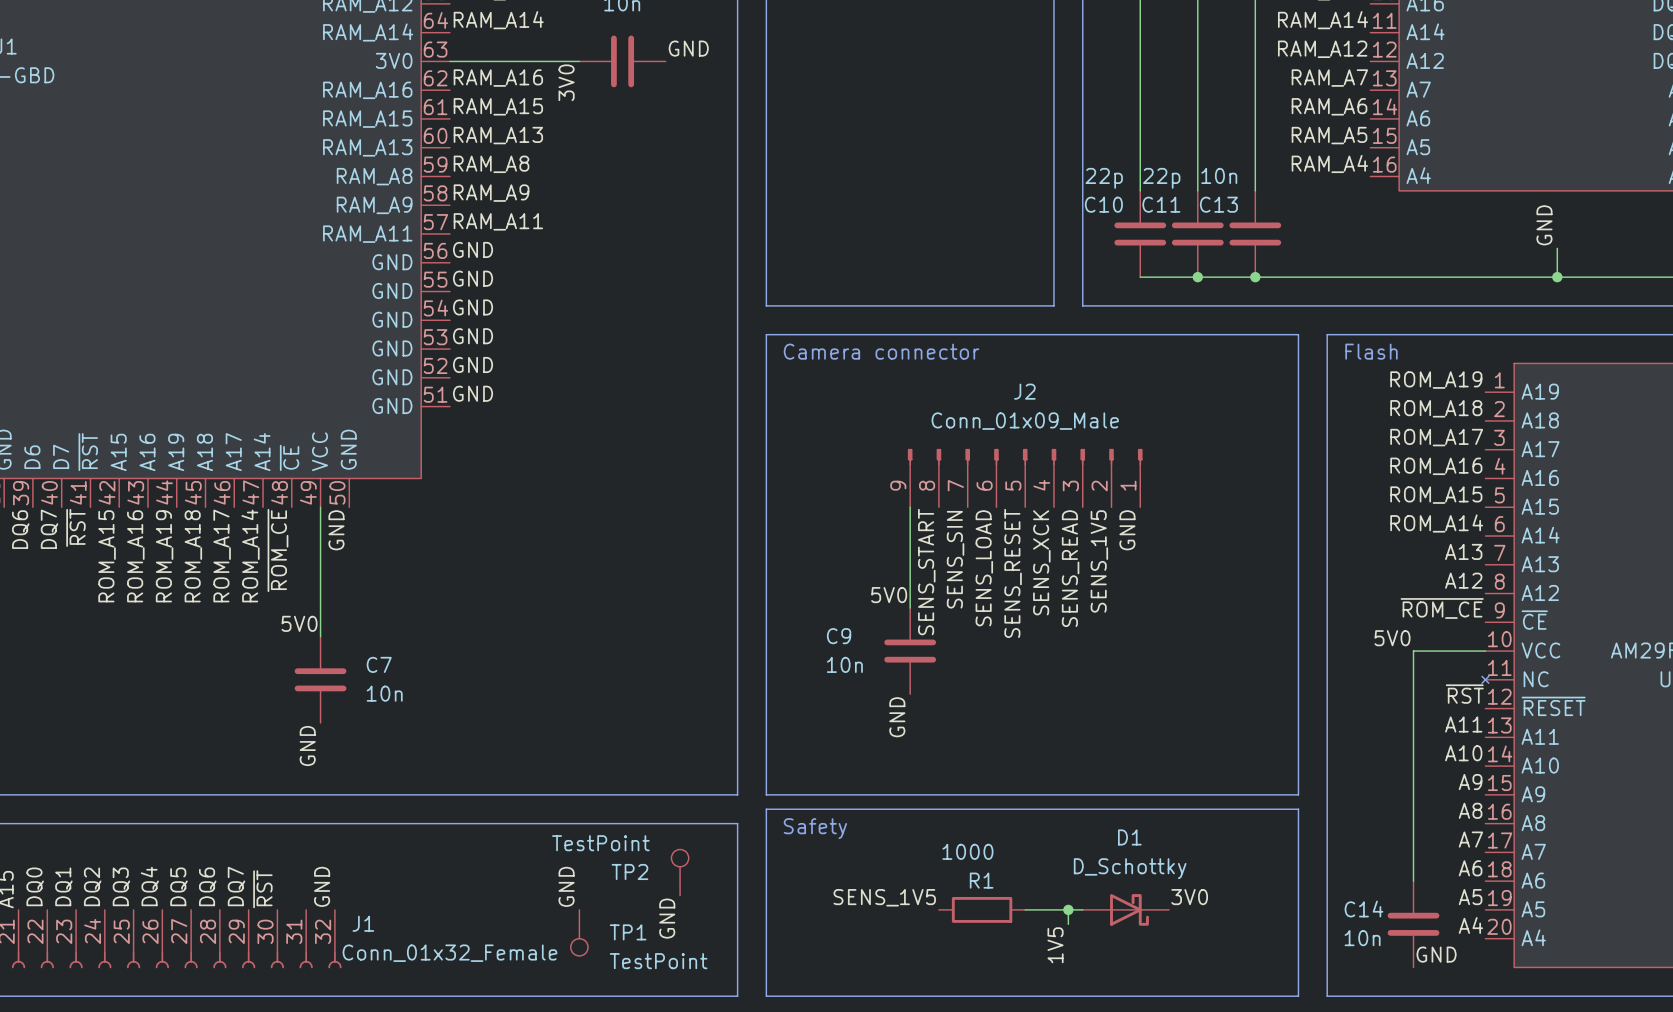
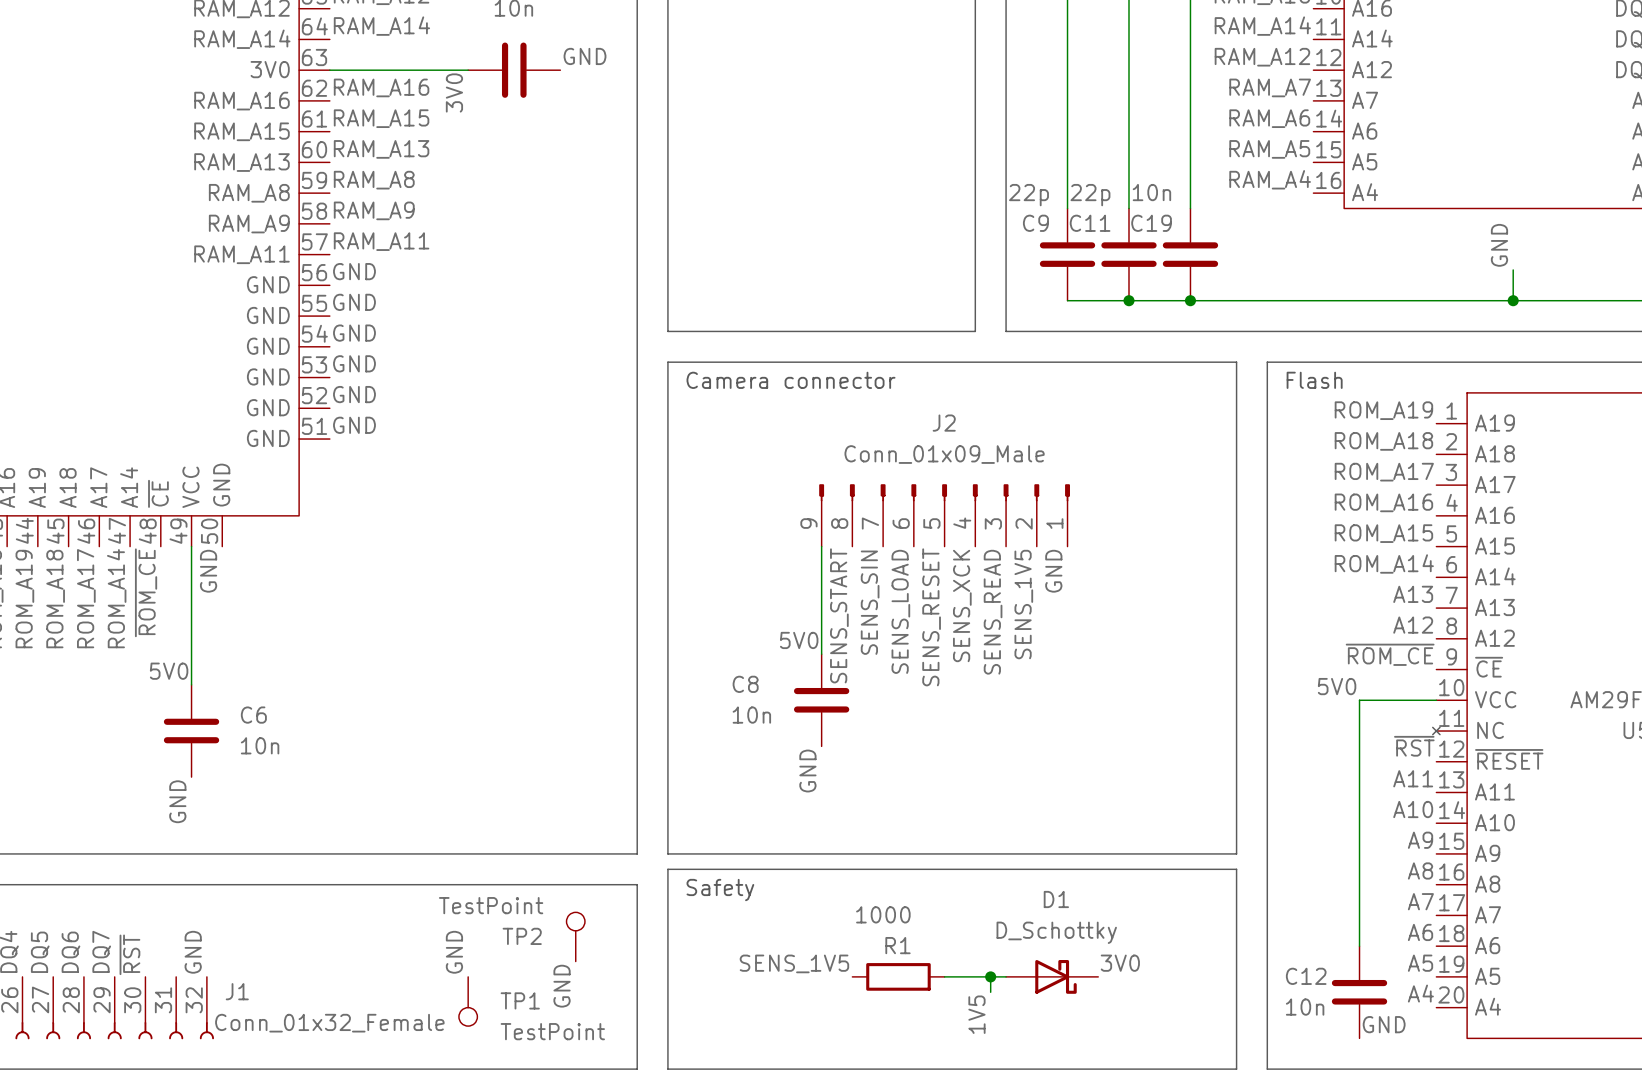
C10 name: C10 (1103, 204) -> C9 (1035, 223)
C13 name: C13 (1218, 204) -> C19 (1151, 223)
C9 name: C9 (839, 636) -> C8 (745, 684)
C7 name: C7 (379, 664) -> C6 (253, 715)
C14 name: C14 (1363, 909) -> C12 (1306, 976)

